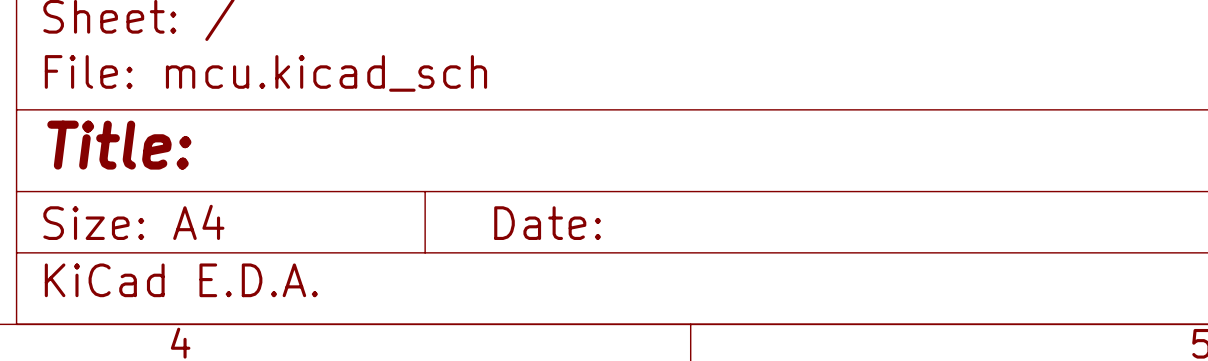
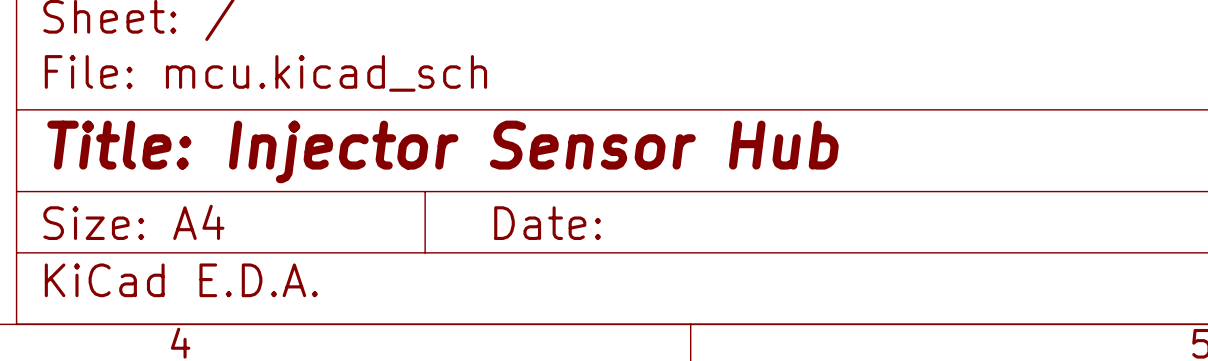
title block: Title: (119, 145) -> Title: Injector Sensor Hub (443, 151)

